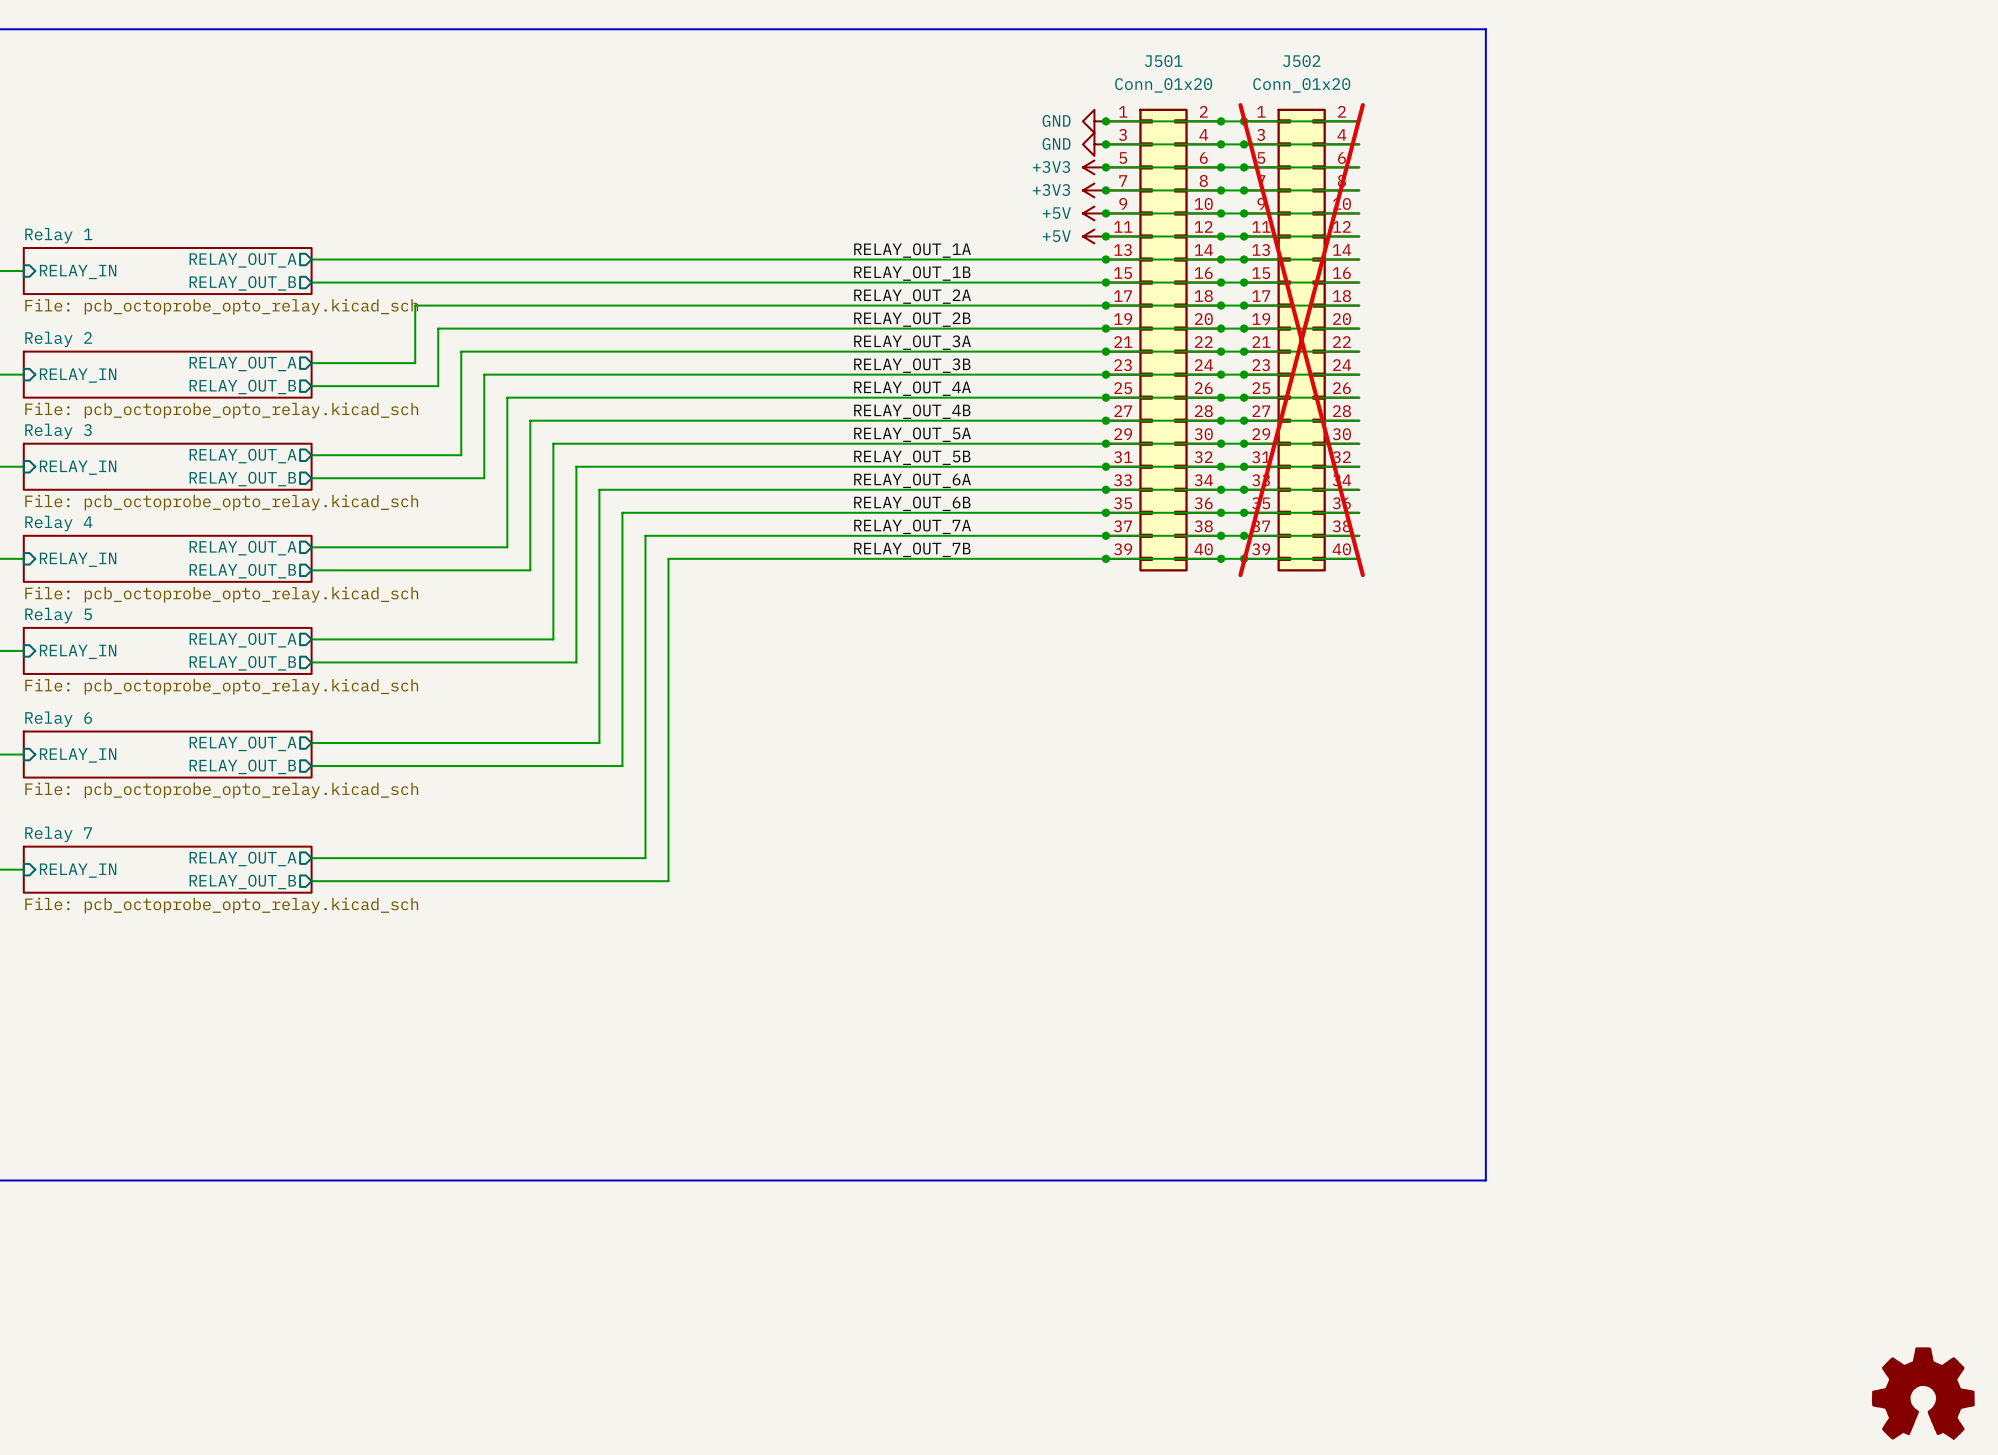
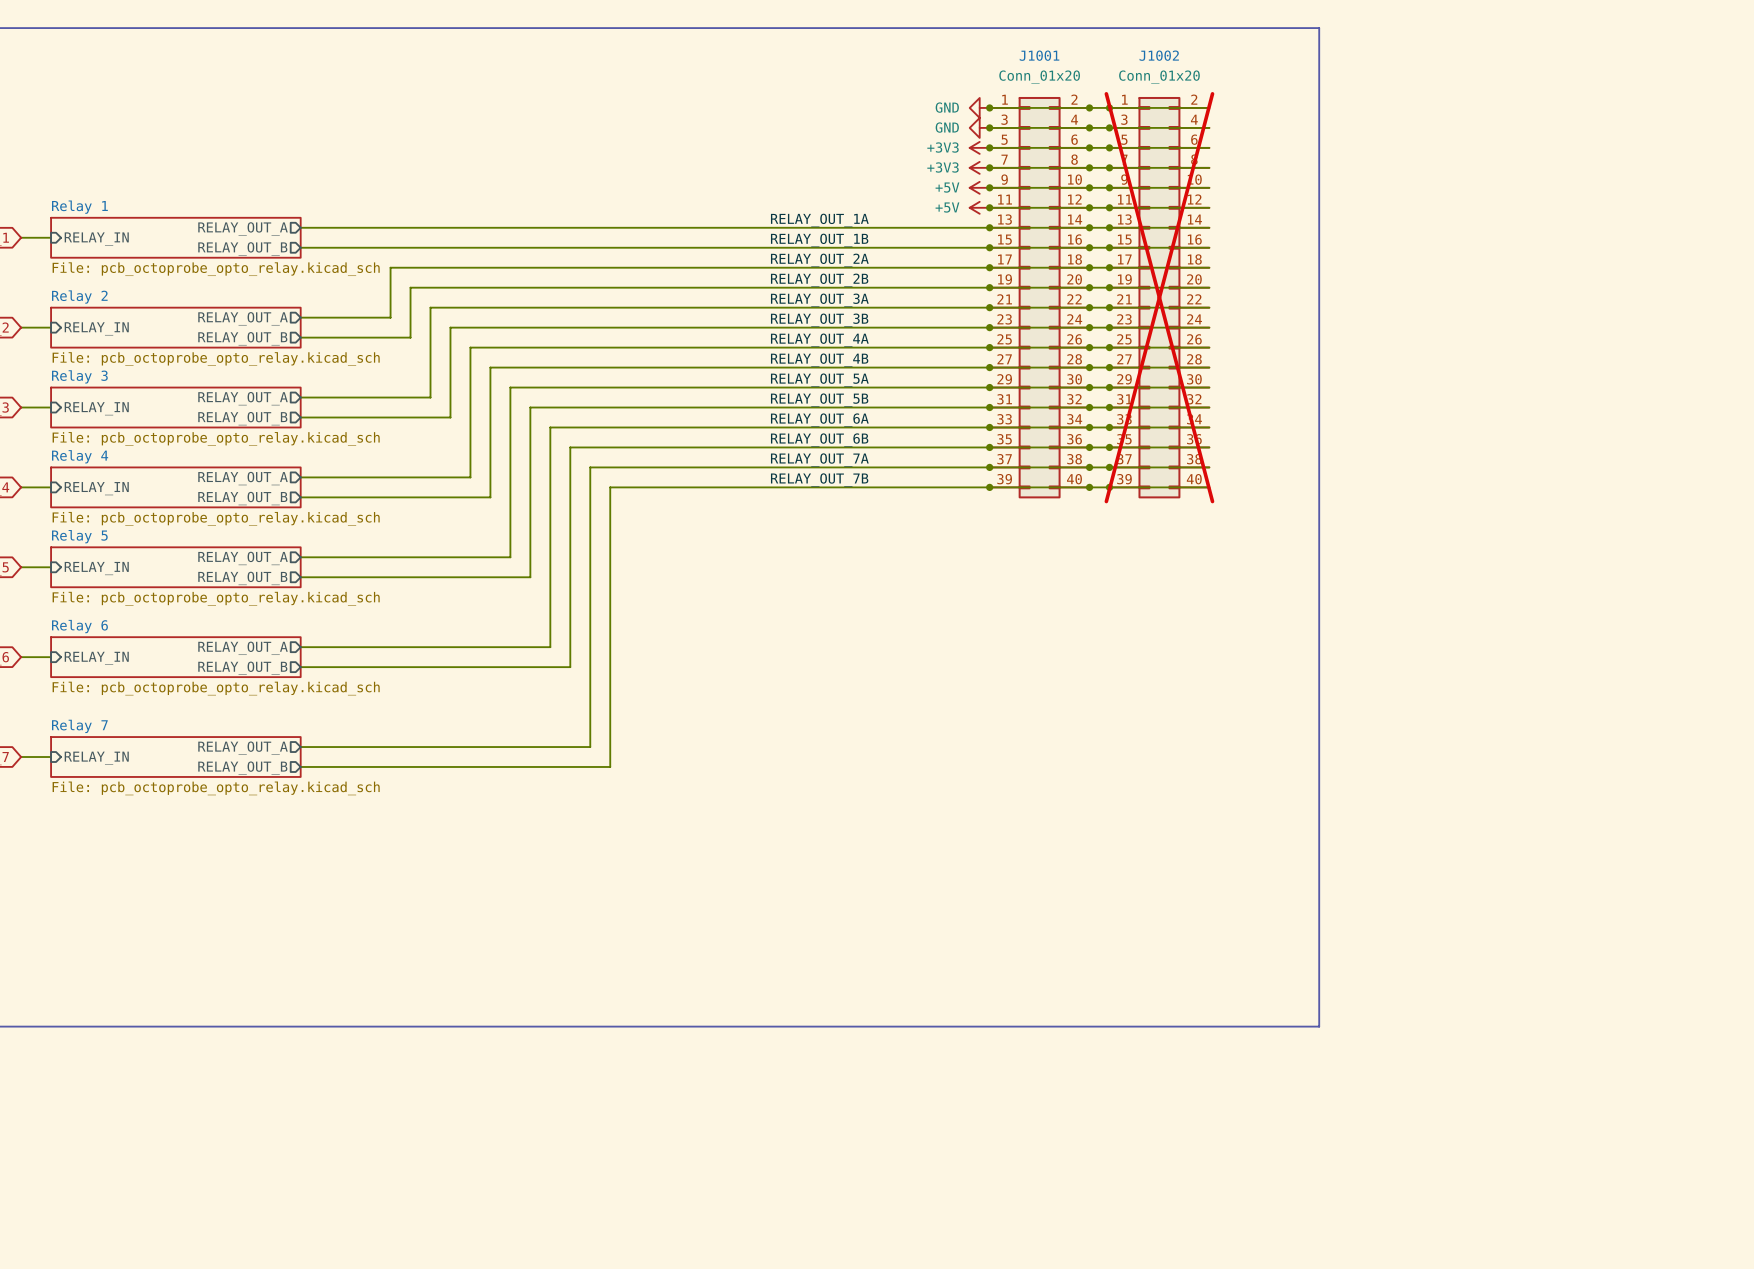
J501 name: J501 (1163, 61) -> J1001 (1039, 55)
J502 name: J502 (1301, 61) -> J1002 (1159, 55)
power symbol: (1923, 1393) -> none

